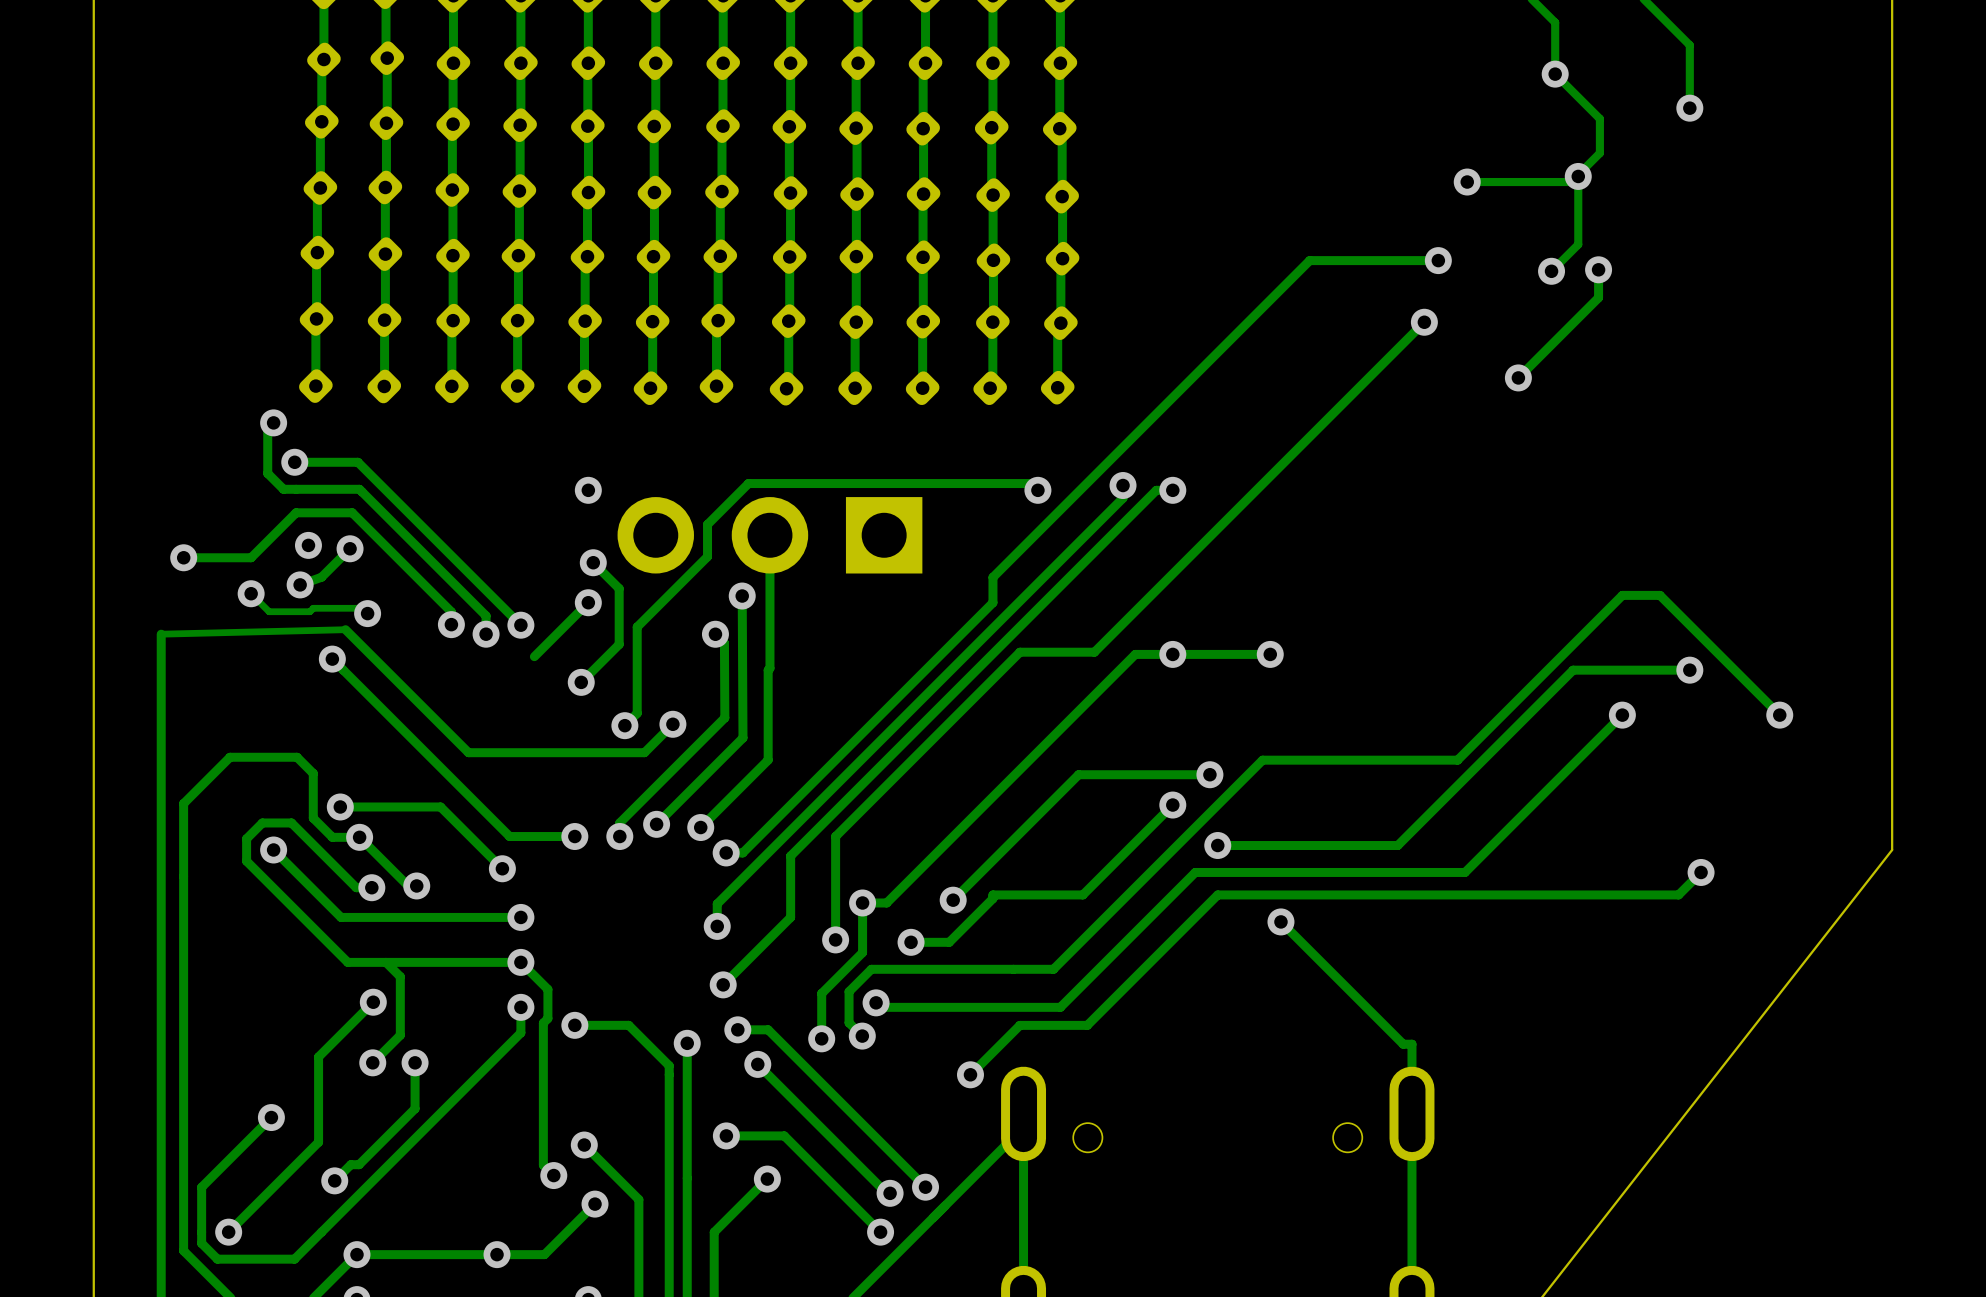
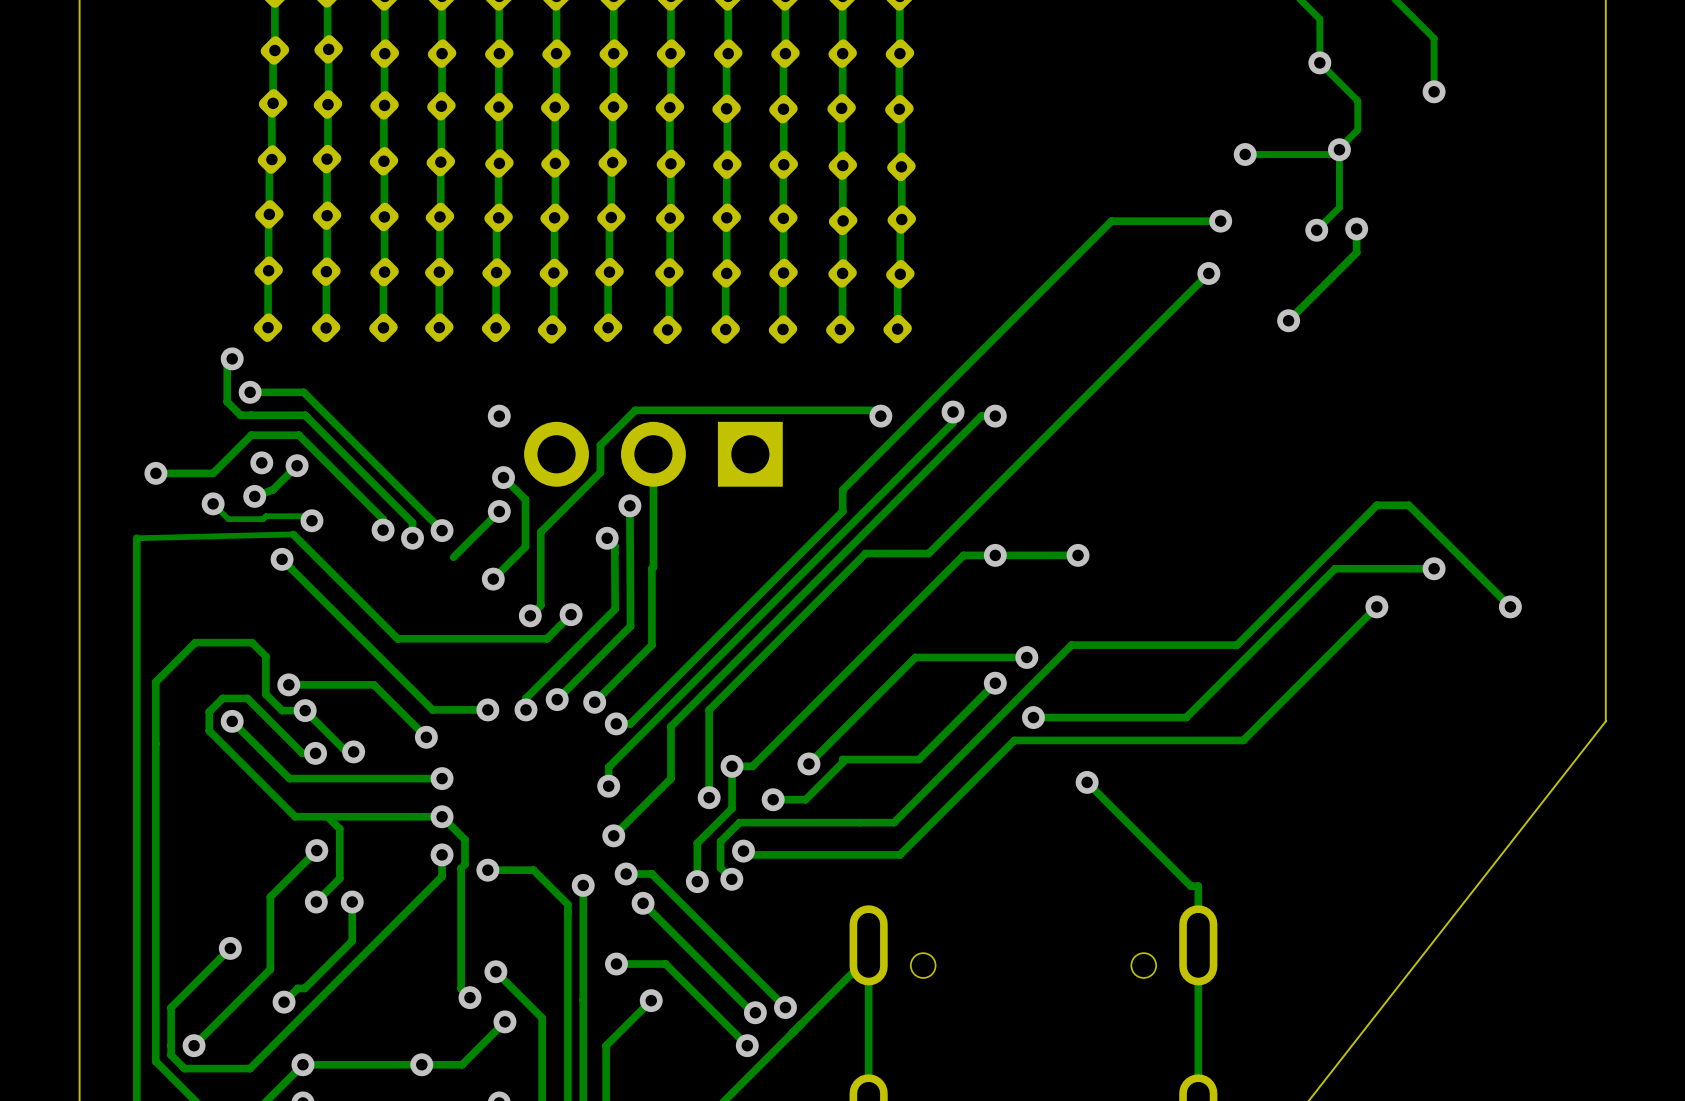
track: (1701, 872) (1678, 894) (1217, 894) (1087, 1025) (1019, 1025) (970, 1074) -> none
via: (1701, 872) -> none
via: (970, 1074) -> none

